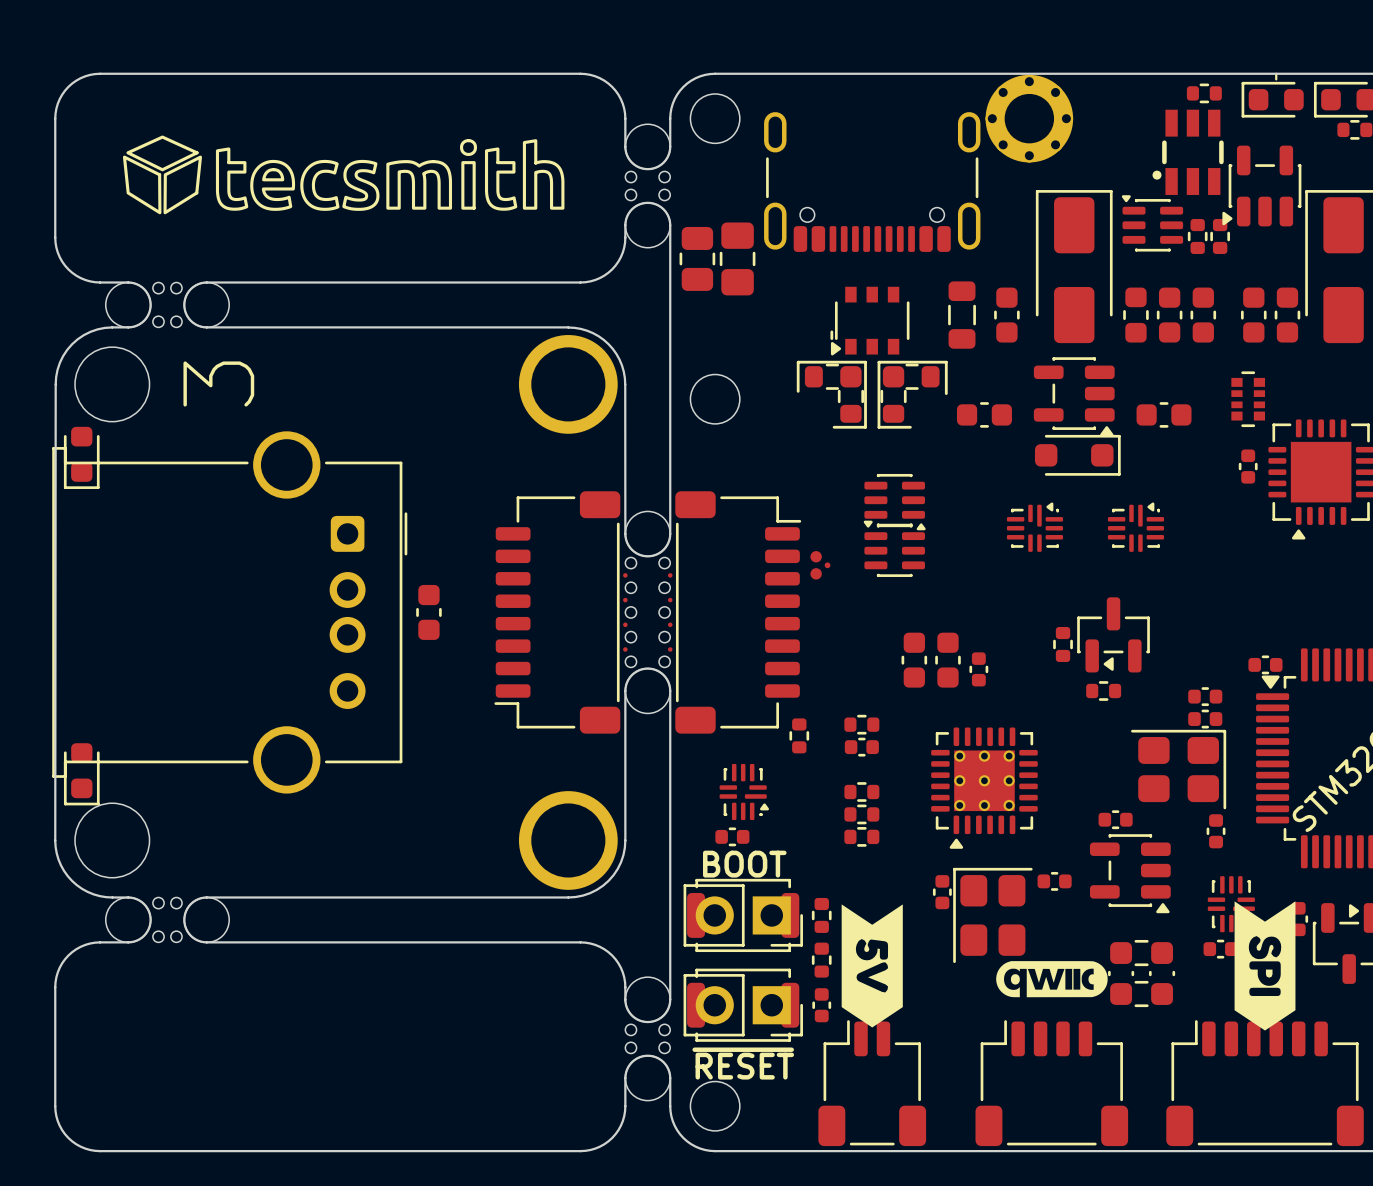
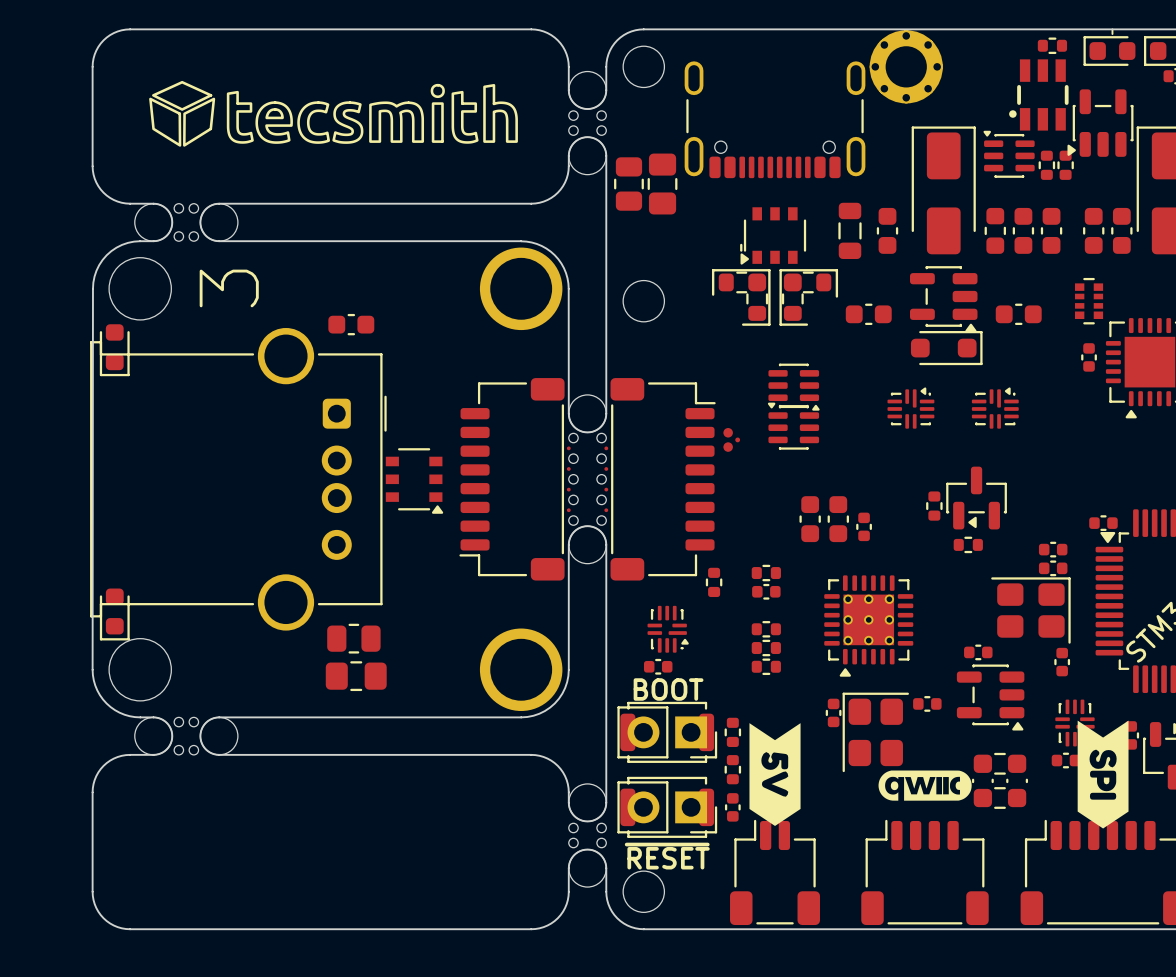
part: none -> (351, 324)
part footprint: [416, 584, 442, 640] -> [385, 448, 444, 514]
part: none -> (353, 638)
part: none -> (356, 676)

